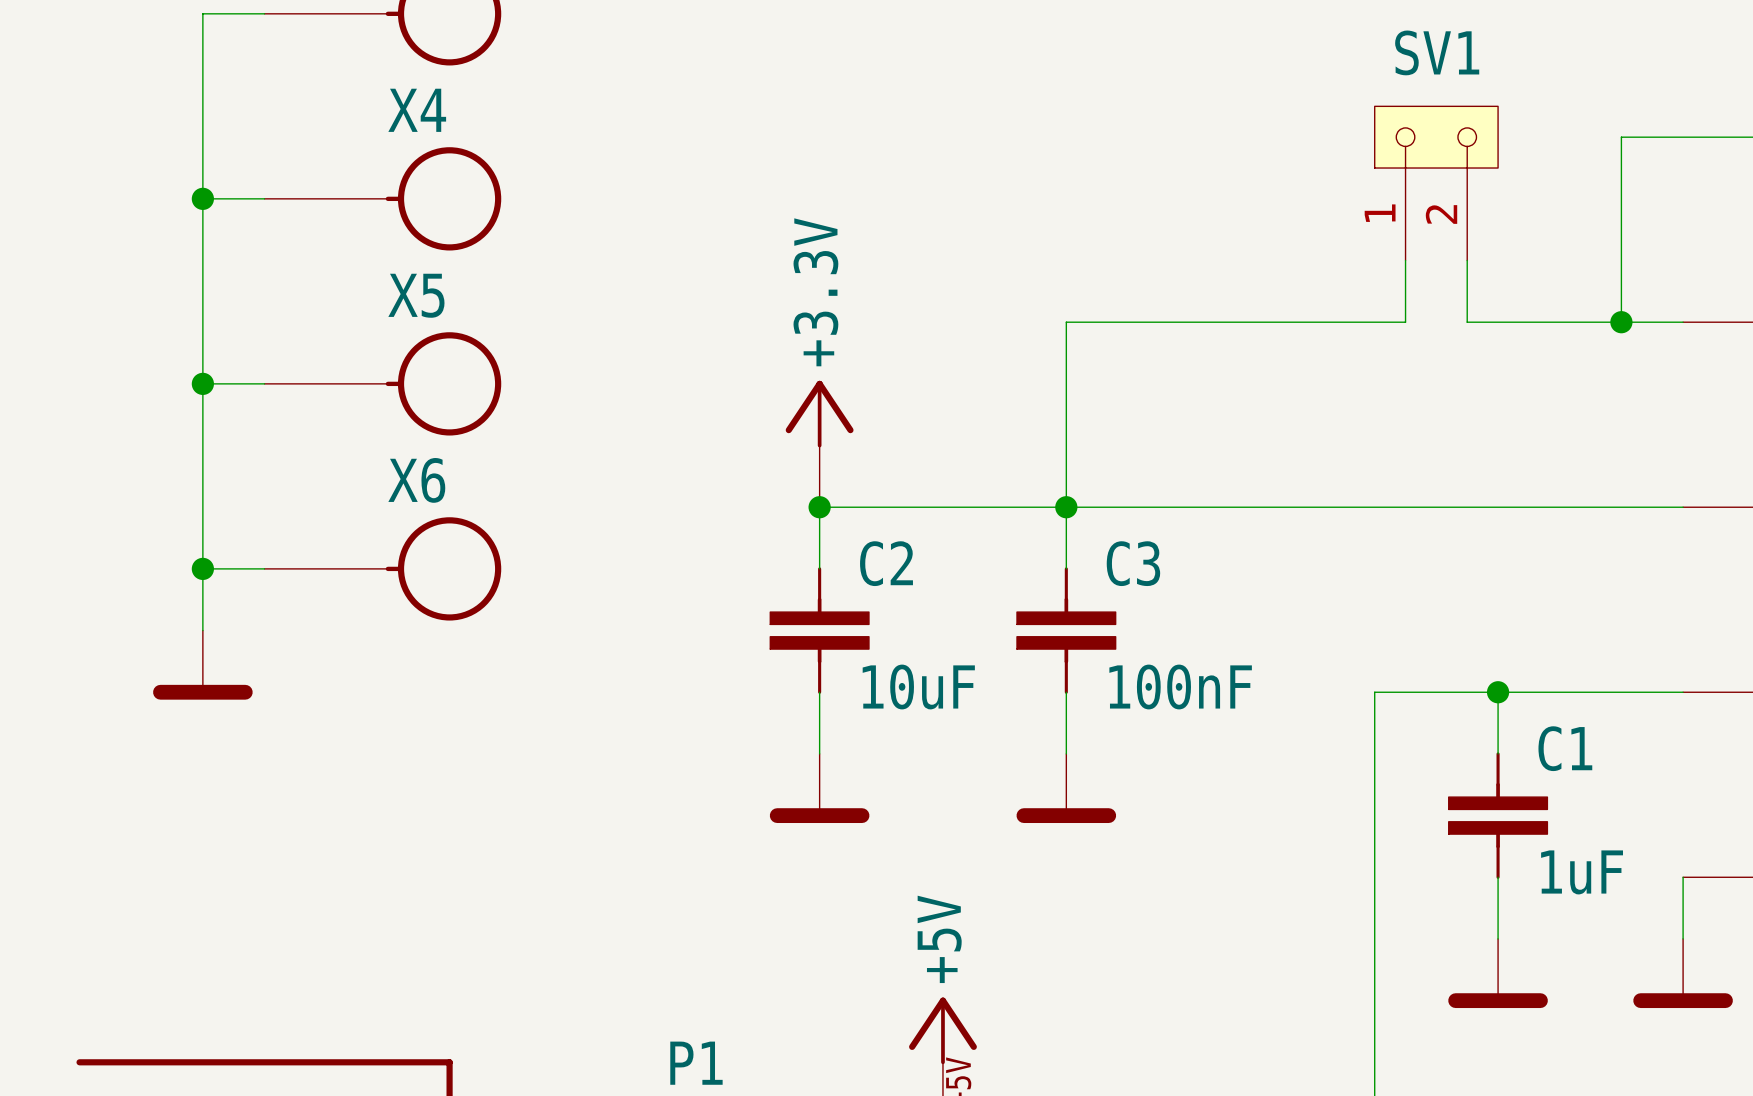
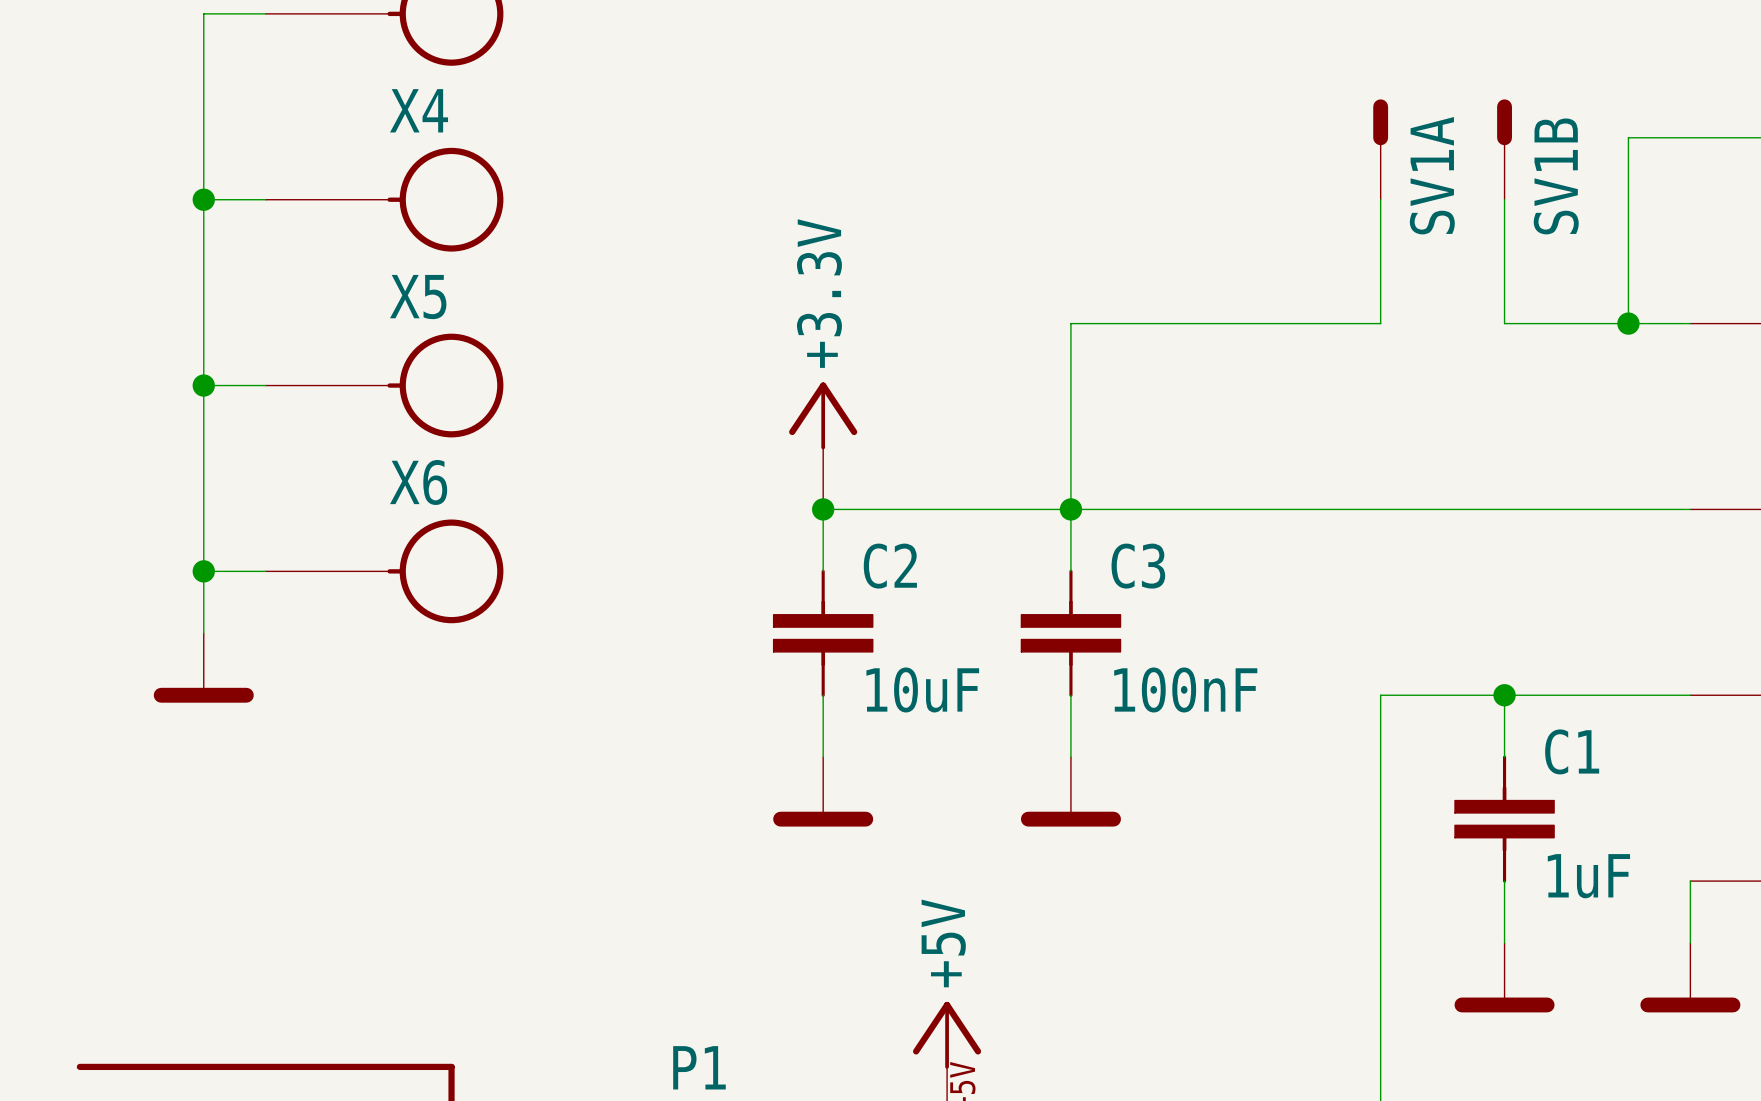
SV1A: none -> (1380, 149)
SV1B: none -> (1504, 149)
SV1: (1436, 183) -> none
wire: (1405, 260) (1405, 322) (1374, 322) -> (1380, 199) (1380, 323)
wire: (1467, 260) (1467, 322) (1498, 322) -> (1504, 199) (1504, 323)

